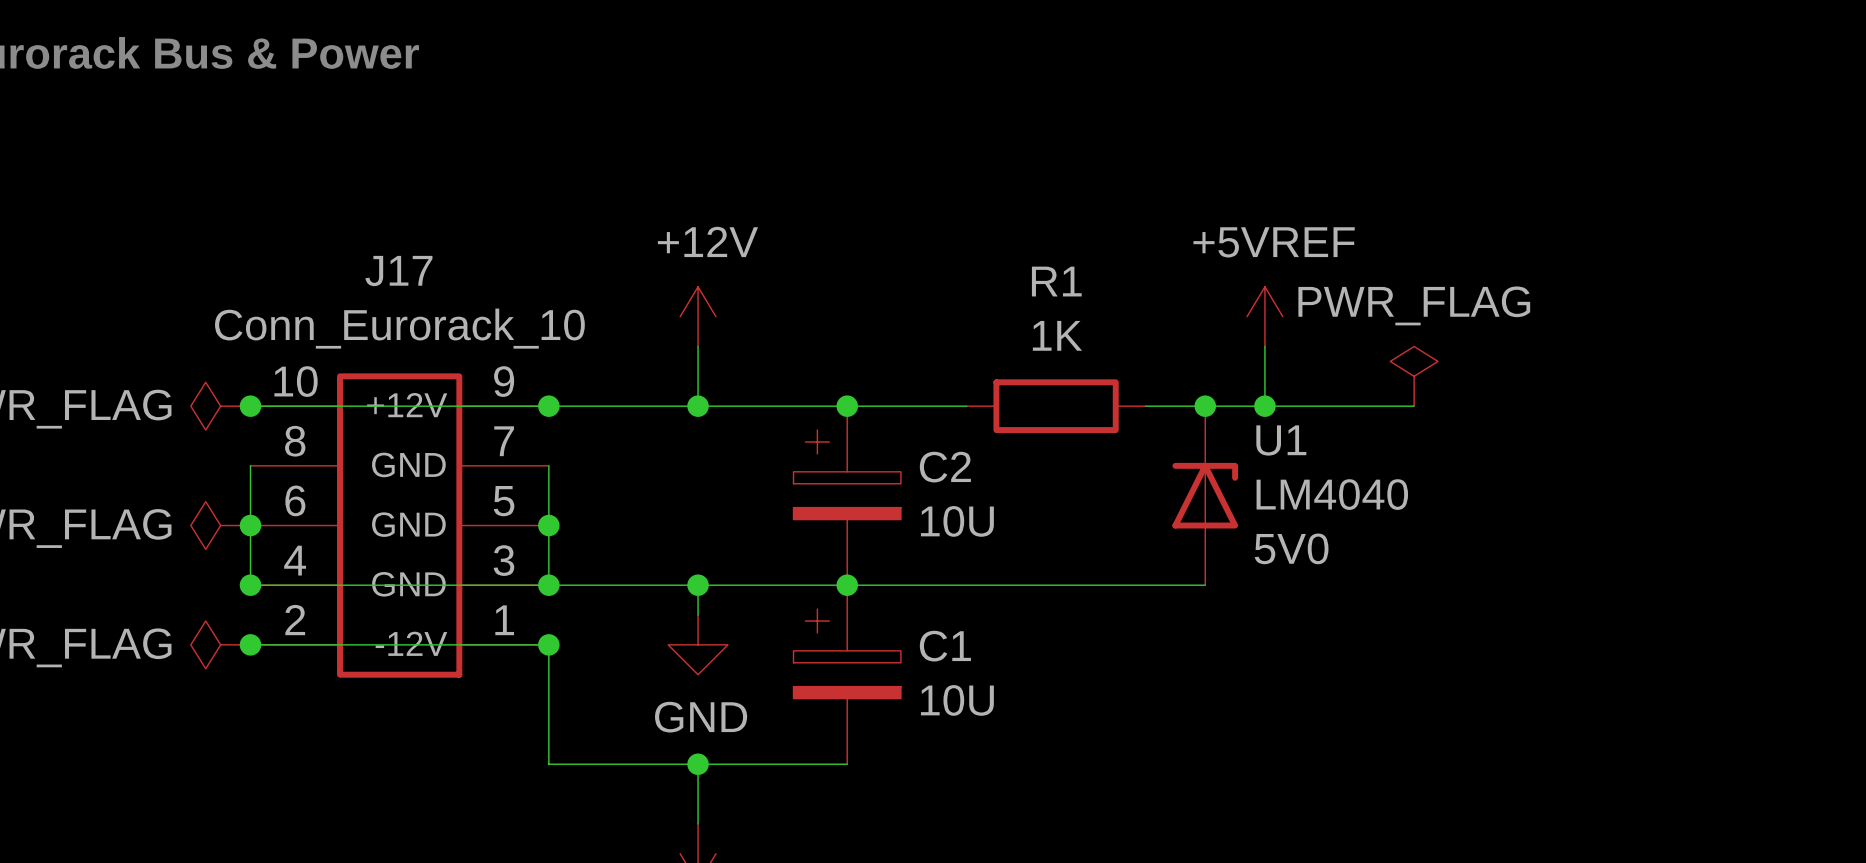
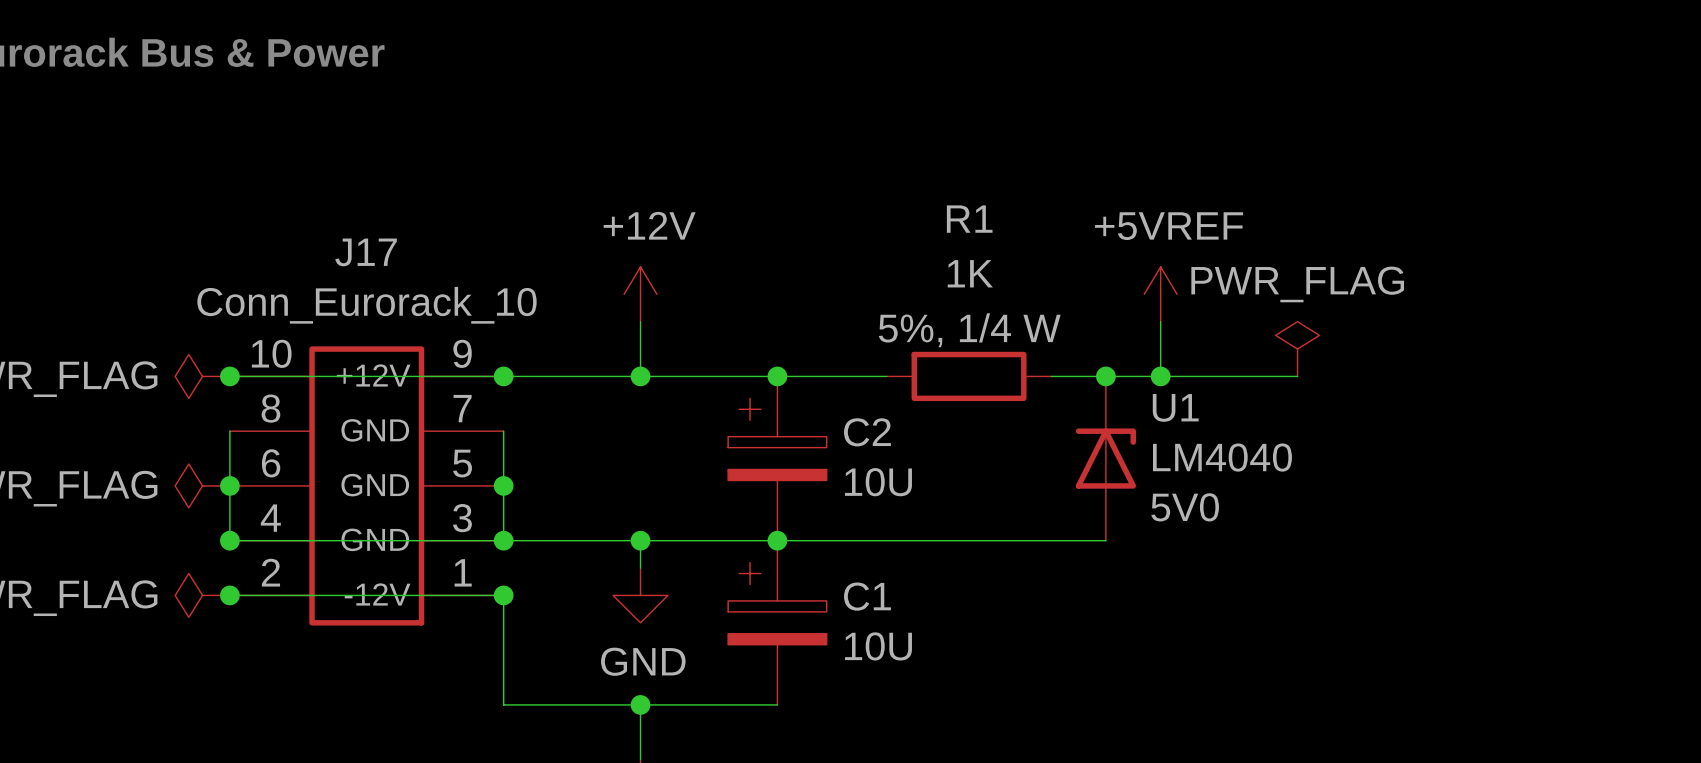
R1 name position: R1 (1056, 281) -> R1 (969, 219)
R1 value position: 1K (1057, 335) -> 1K (970, 273)
R1 text: none -> 5%, 1/4 W (969, 330)

